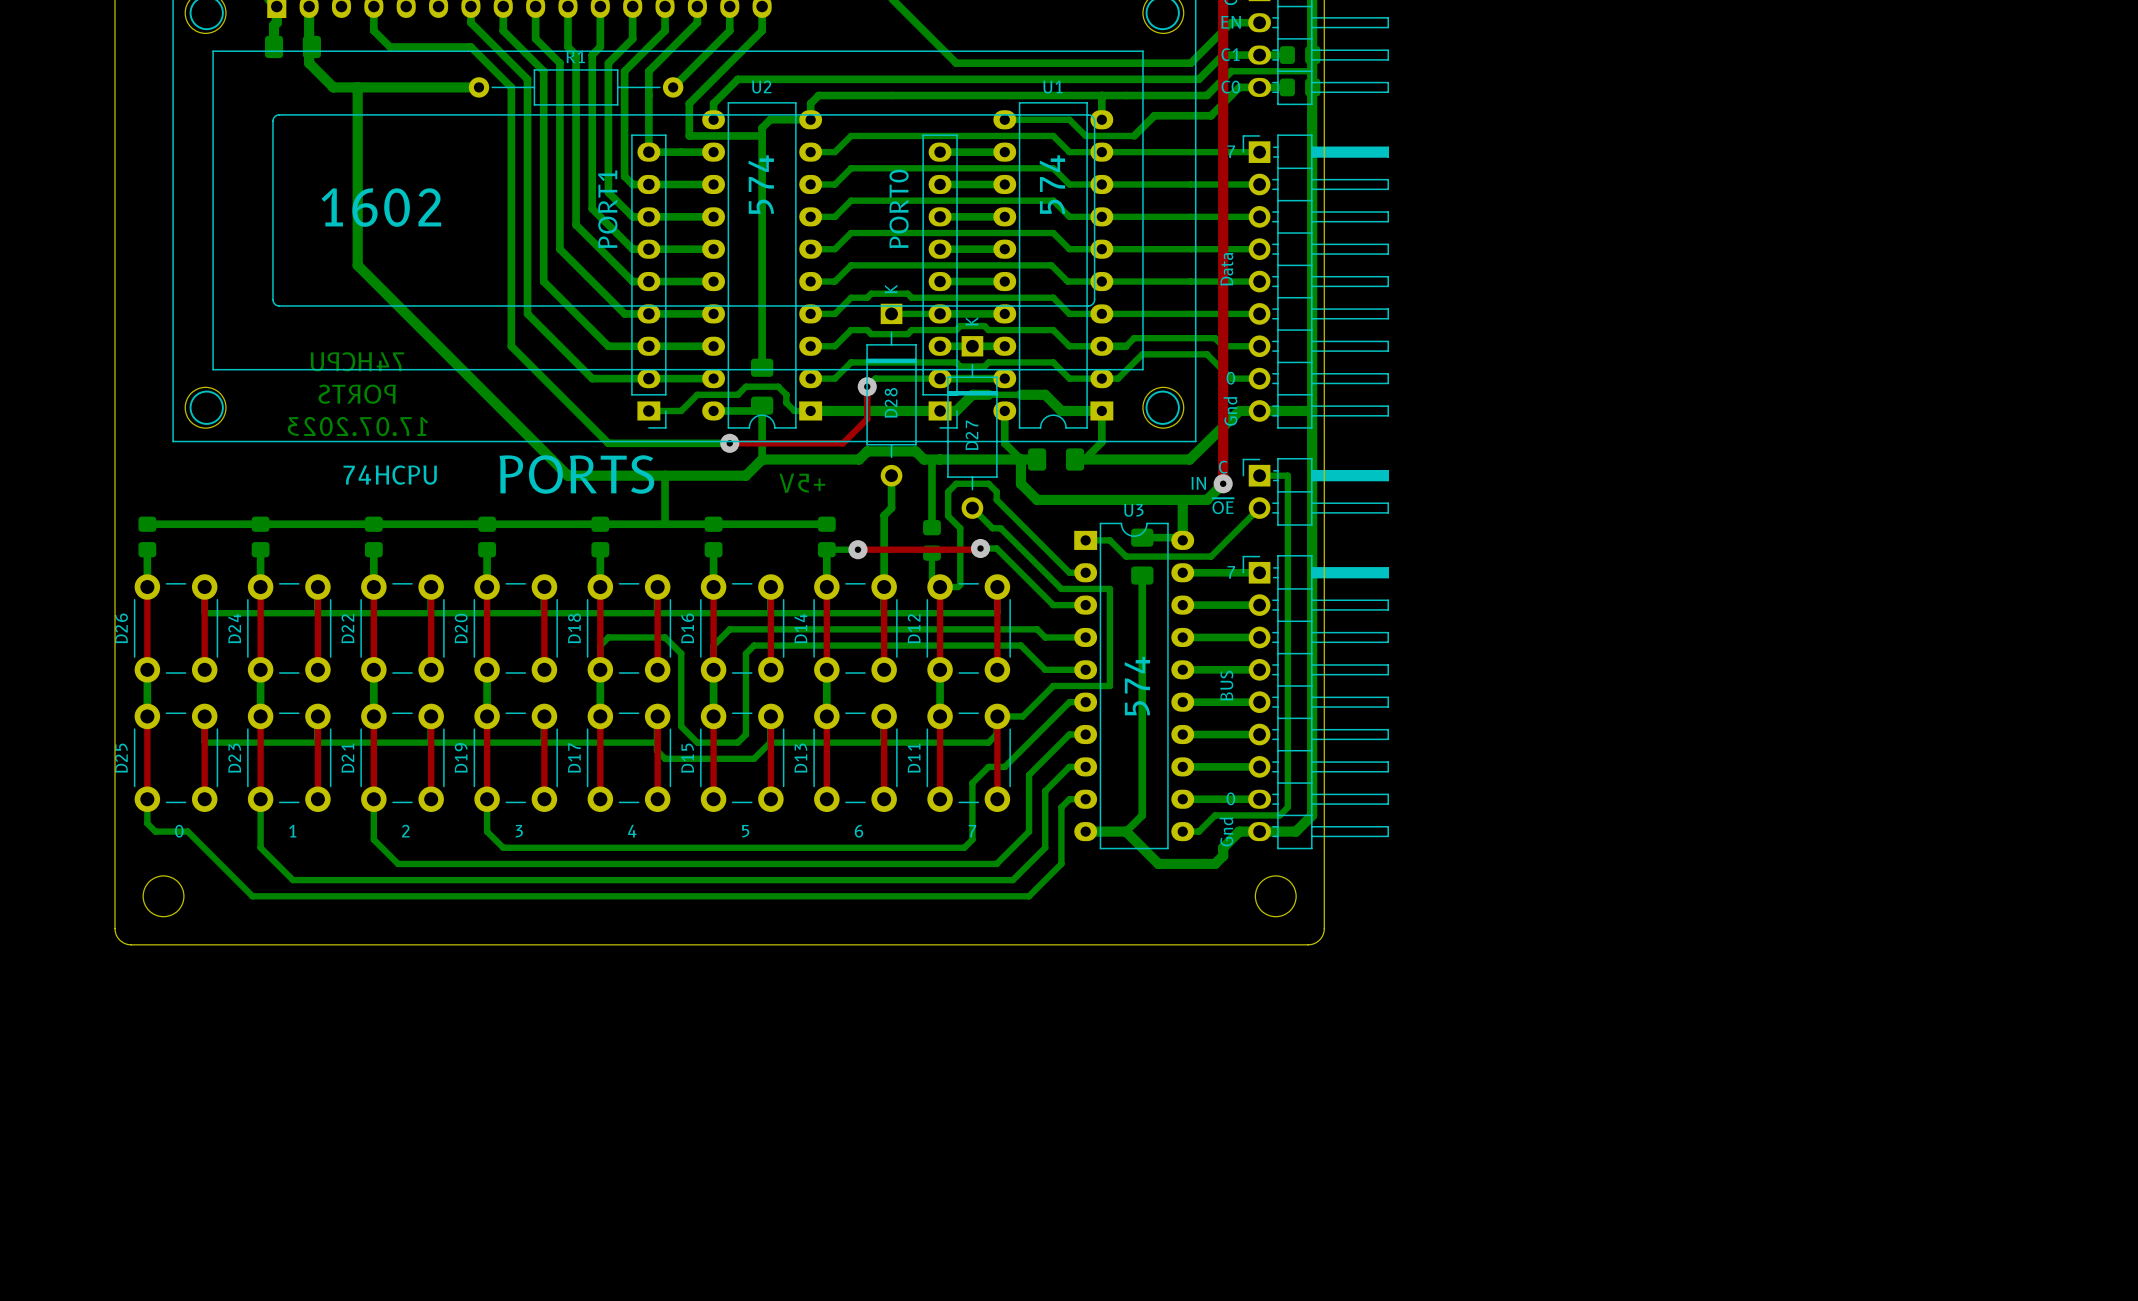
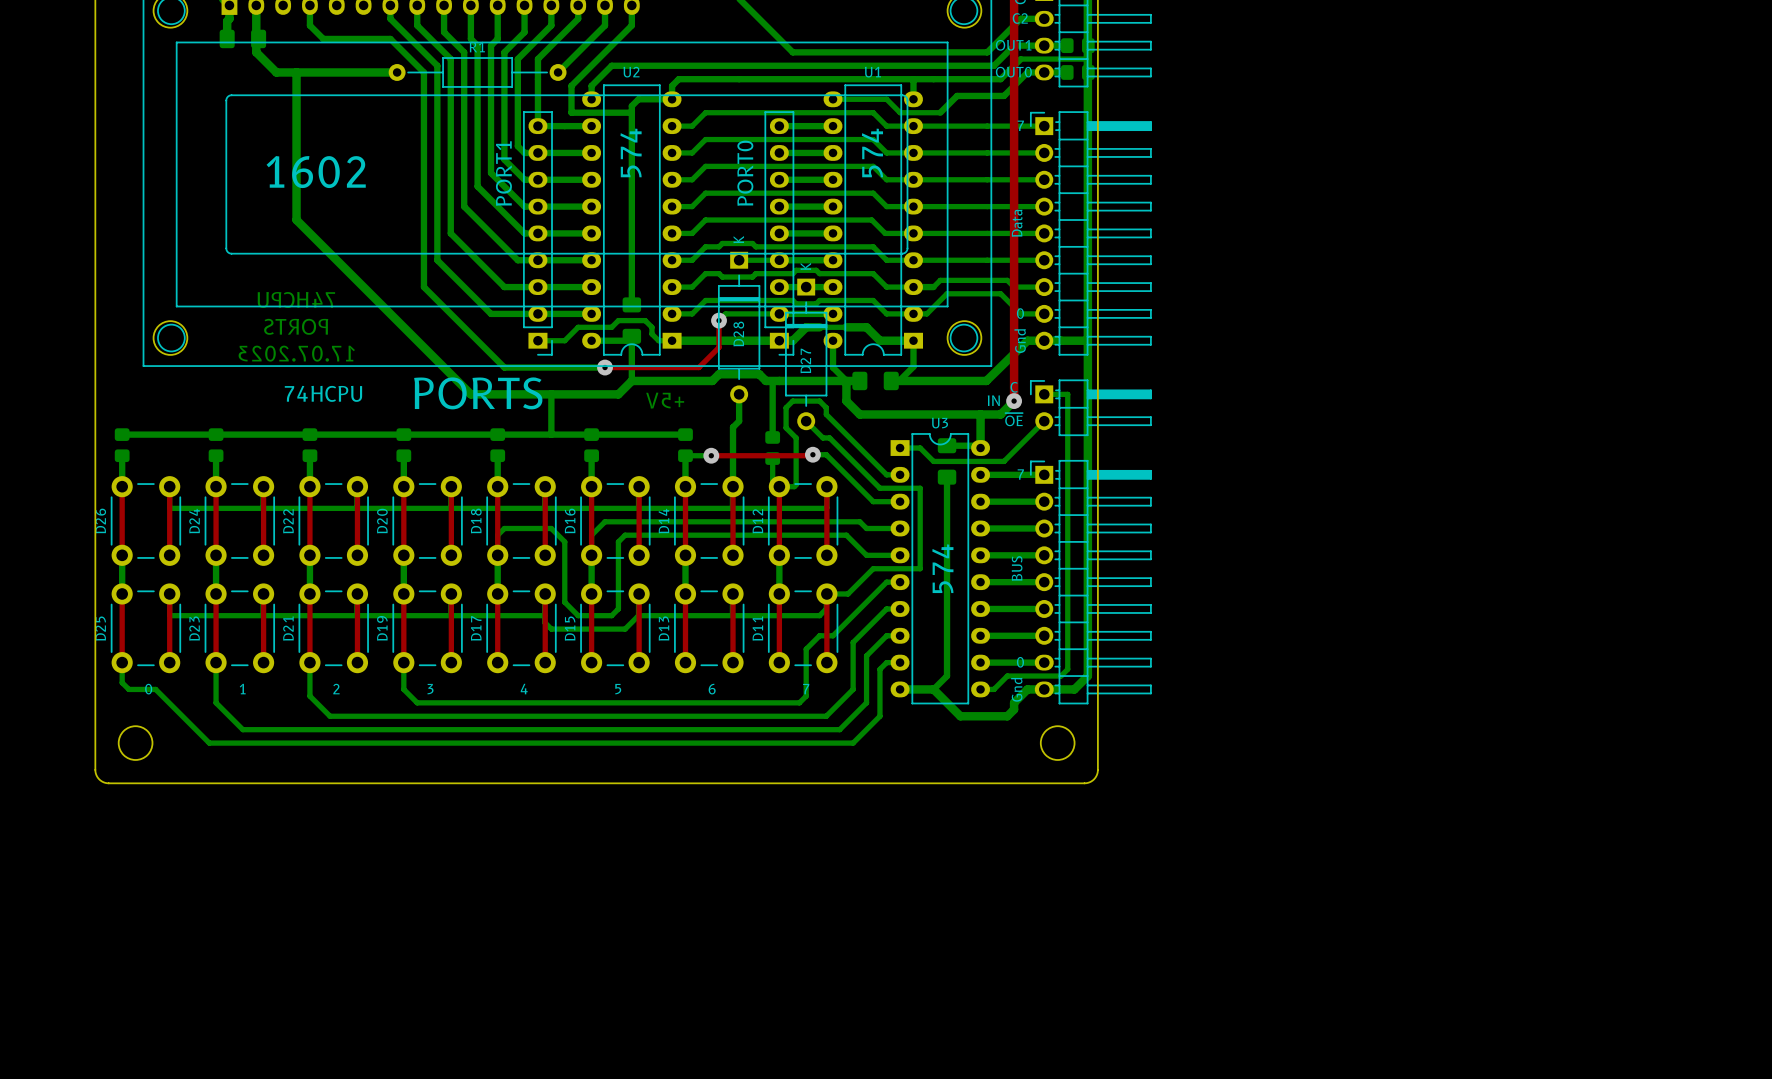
text: EN (1231, 22) -> C2 (1020, 18)
text: C1 (1230, 54) -> OUT1 (1013, 45)
text: C0 (1230, 87) -> OUT0 (1013, 72)

